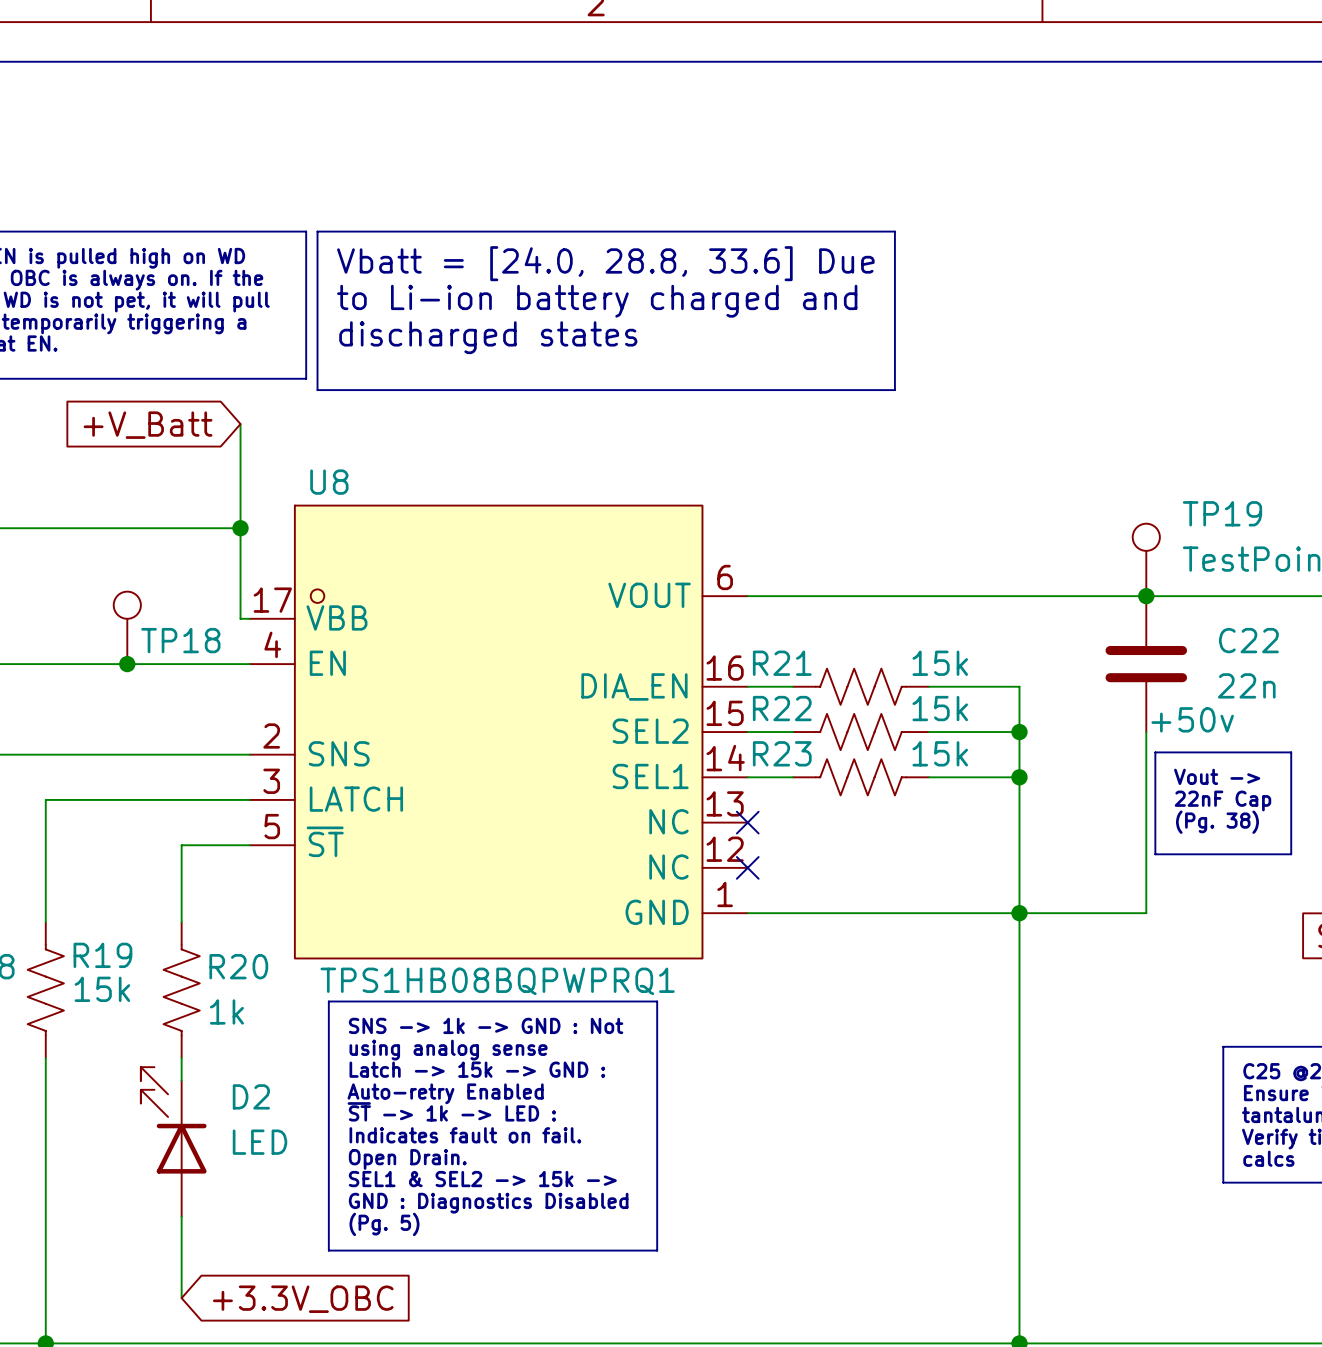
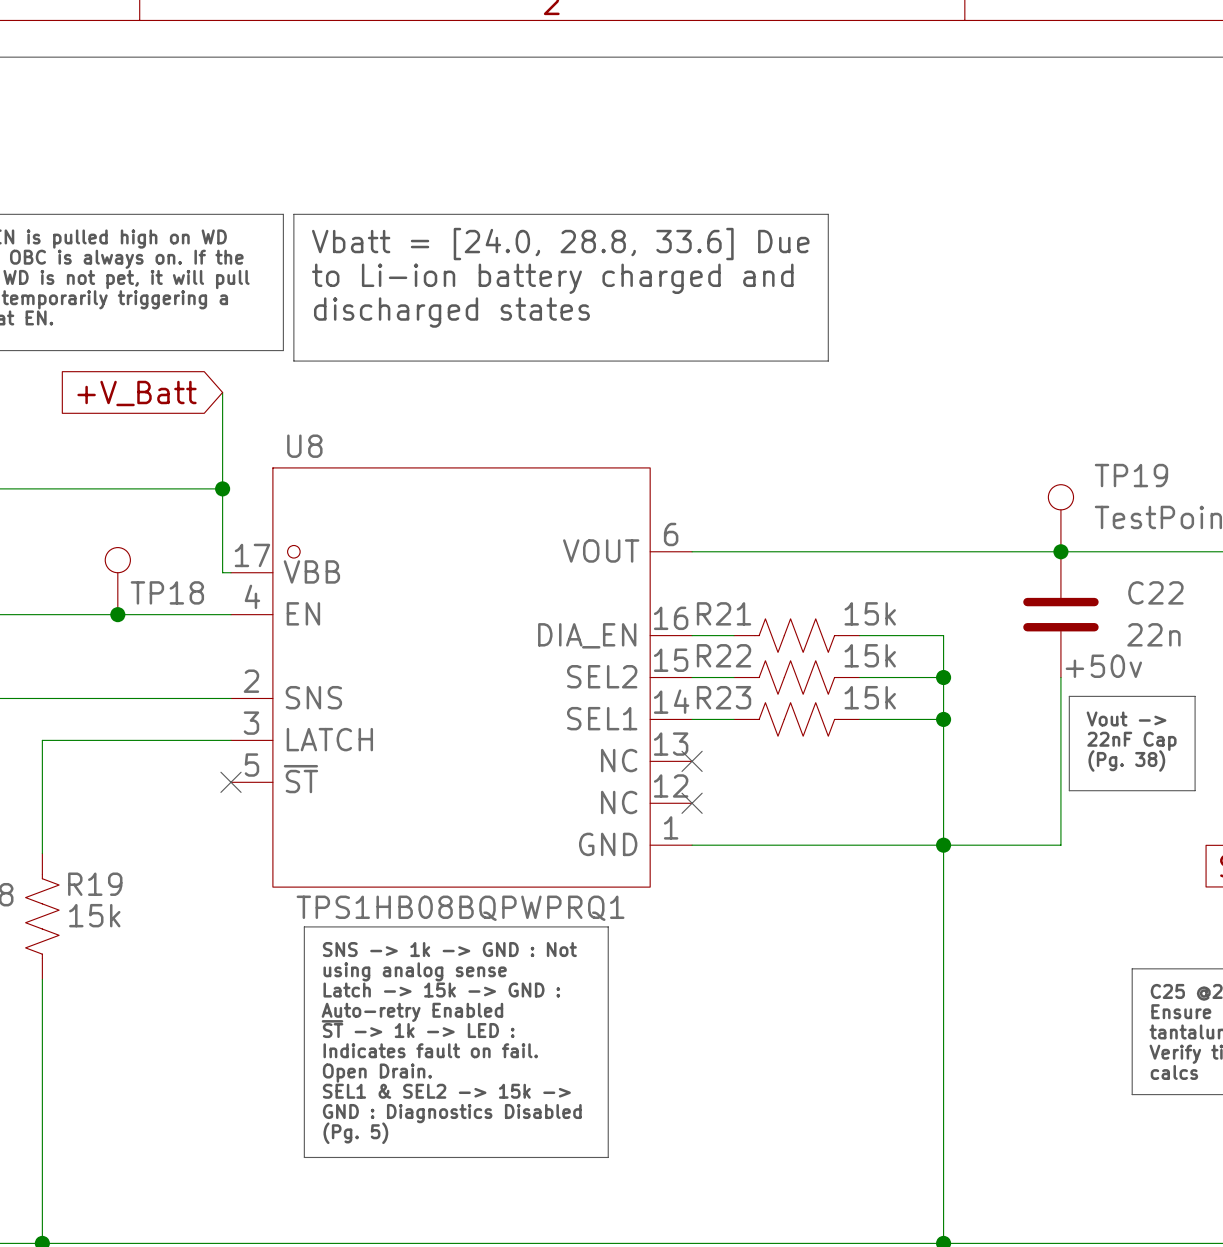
wire: (249, 845) (181, 845) (181, 922) -> none
no-connect mark: none -> (230, 782)
R20: 1k (181, 990) -> none
wire: (181, 1058) (181, 1080) -> none
D2: LED (173, 1141) -> none
wire: (181, 1216) (181, 1298) -> none
global label: +3.3V_OBC (303, 1299) -> none

